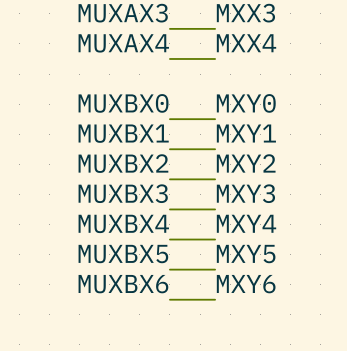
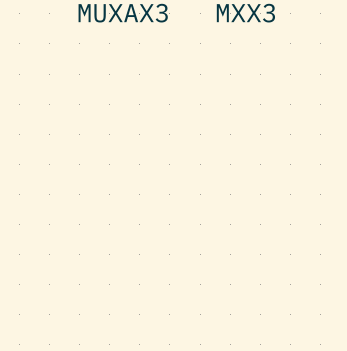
wire: (169, 28) (215, 28) -> none
label: MUXAX4 (123, 43) -> none
label: MXX4 (246, 43) -> none
wire: (169, 58) (215, 58) -> none
label: MUXBX0 (123, 103) -> none
label: MXY0 (246, 103) -> none
wire: (169, 119) (215, 119) -> none
label: MUXBX1 (123, 133) -> none
label: MXY1 (246, 133) -> none
wire: (169, 149) (215, 149) -> none
label: MUXBX2 (123, 163) -> none
label: MXY2 (246, 163) -> none
wire: (169, 179) (215, 179) -> none
label: MUXBX3 (123, 193) -> none
label: MXY3 (245, 193) -> none
wire: (169, 209) (215, 209) -> none
label: MUXBX4 (123, 223) -> none
label: MXY4 (246, 223) -> none
wire: (169, 239) (215, 239) -> none
label: MUXBX5 (123, 254) -> none
label: MXY5 (246, 254) -> none
wire: (169, 269) (215, 269) -> none
label: MUXBX6 (123, 284) -> none
label: MXY6 (246, 284) -> none
wire: (169, 299) (215, 299) -> none

